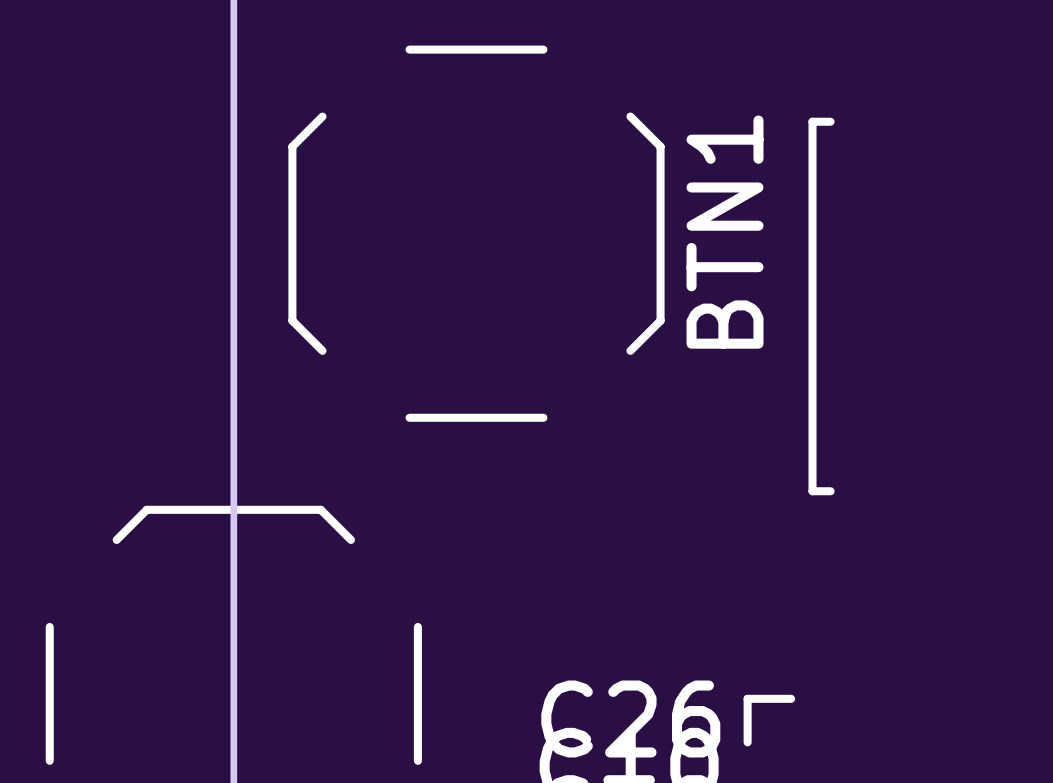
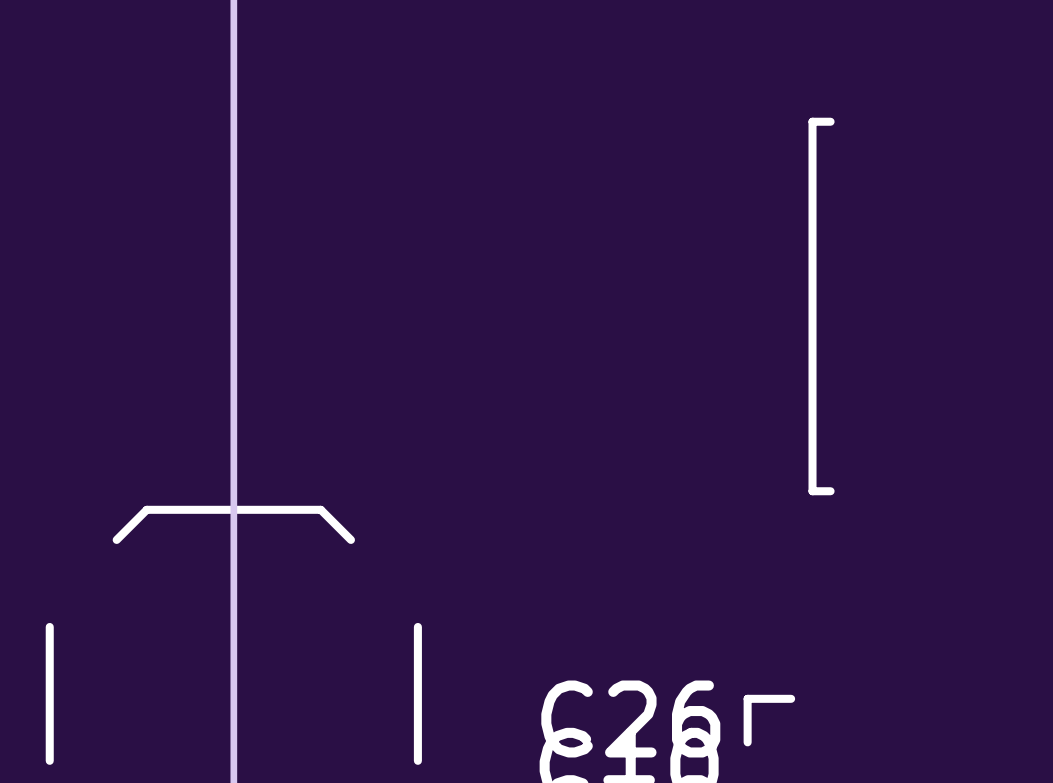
BTN1: (476, 233) -> none

